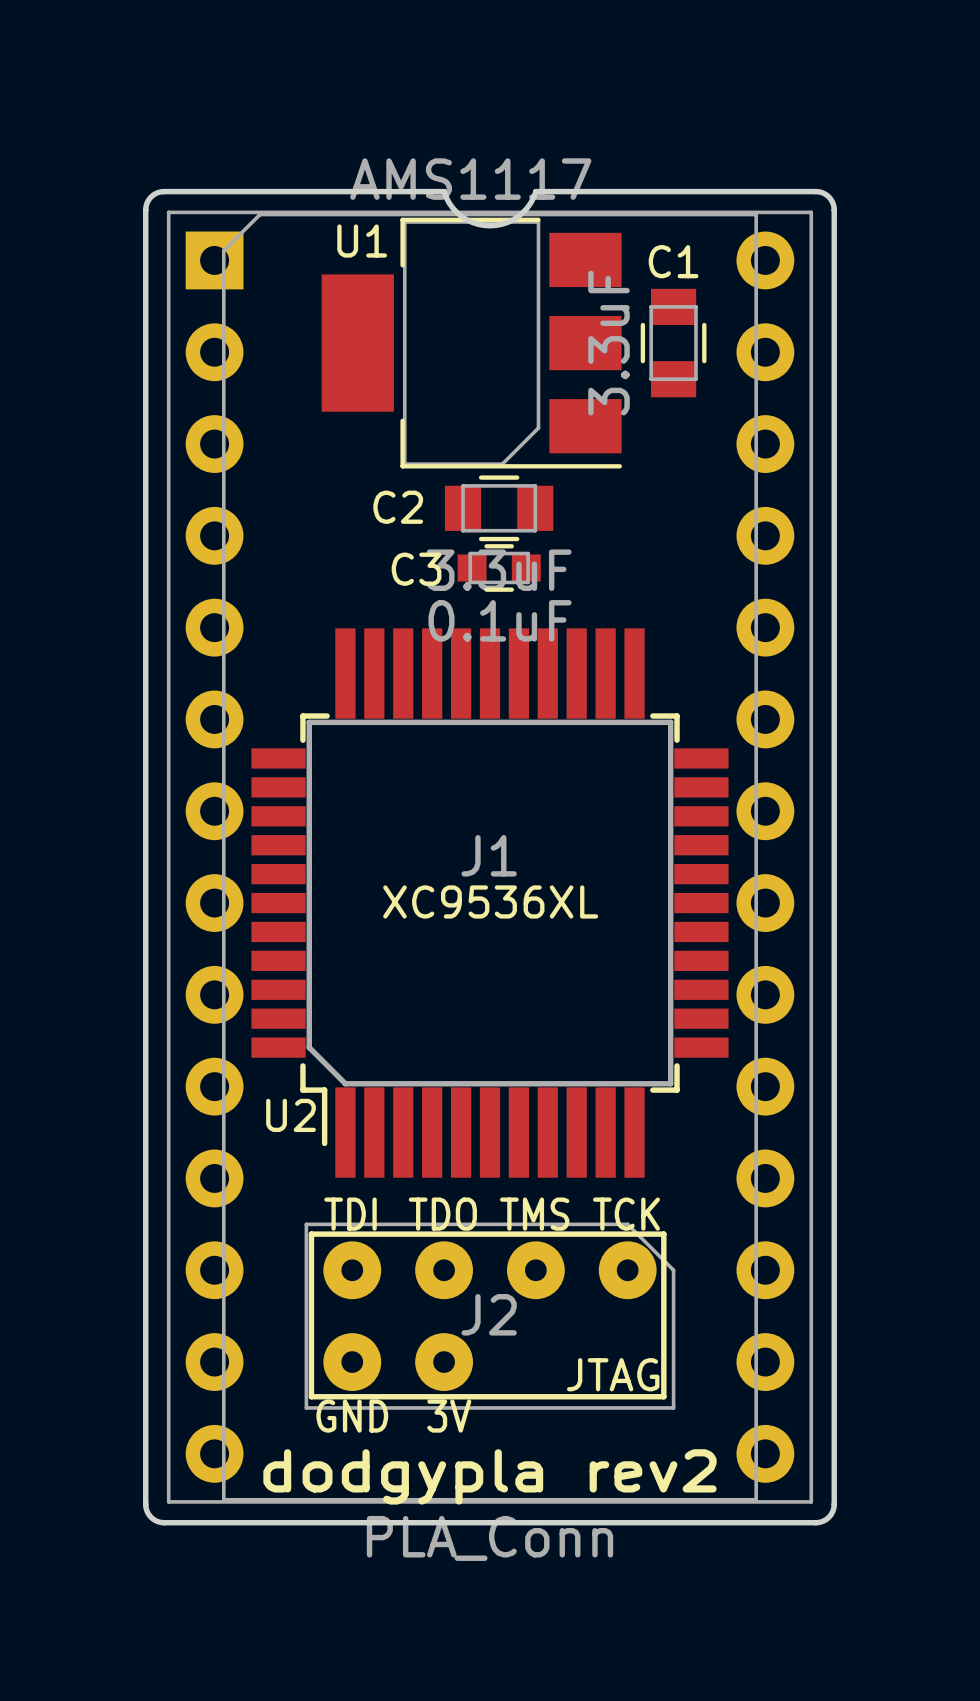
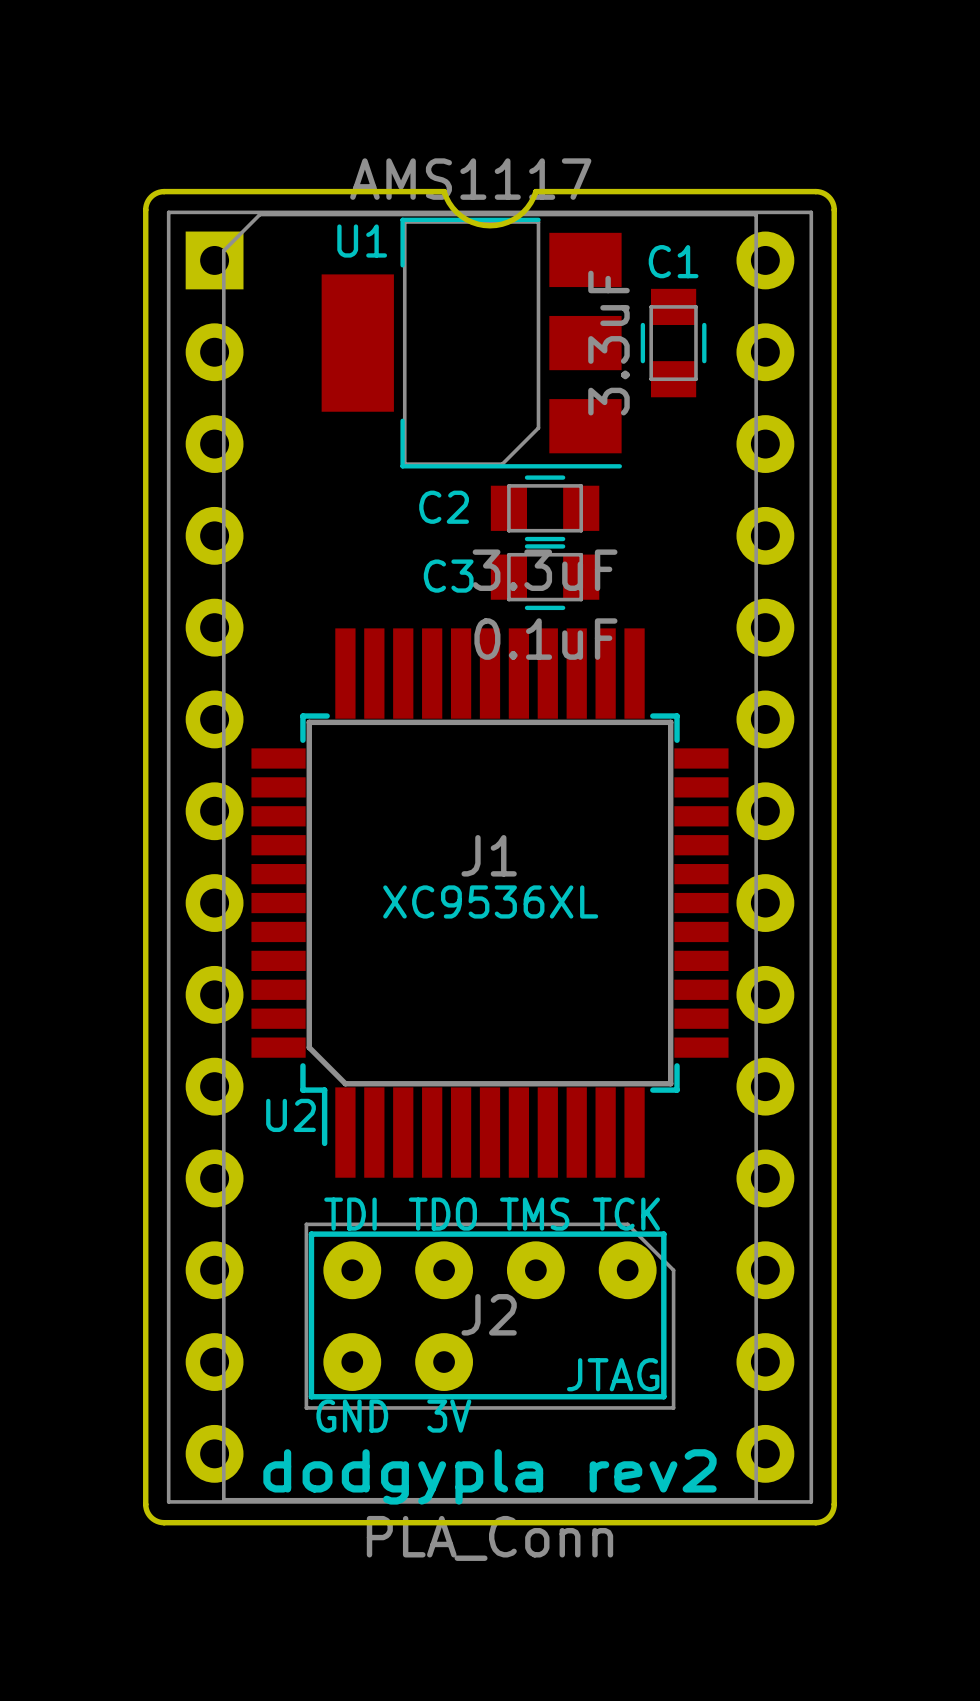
C2 position: (499, 508) -> (545, 508)
C3 footprint: [457, 544, 541, 592] -> [490, 544, 600, 611]

